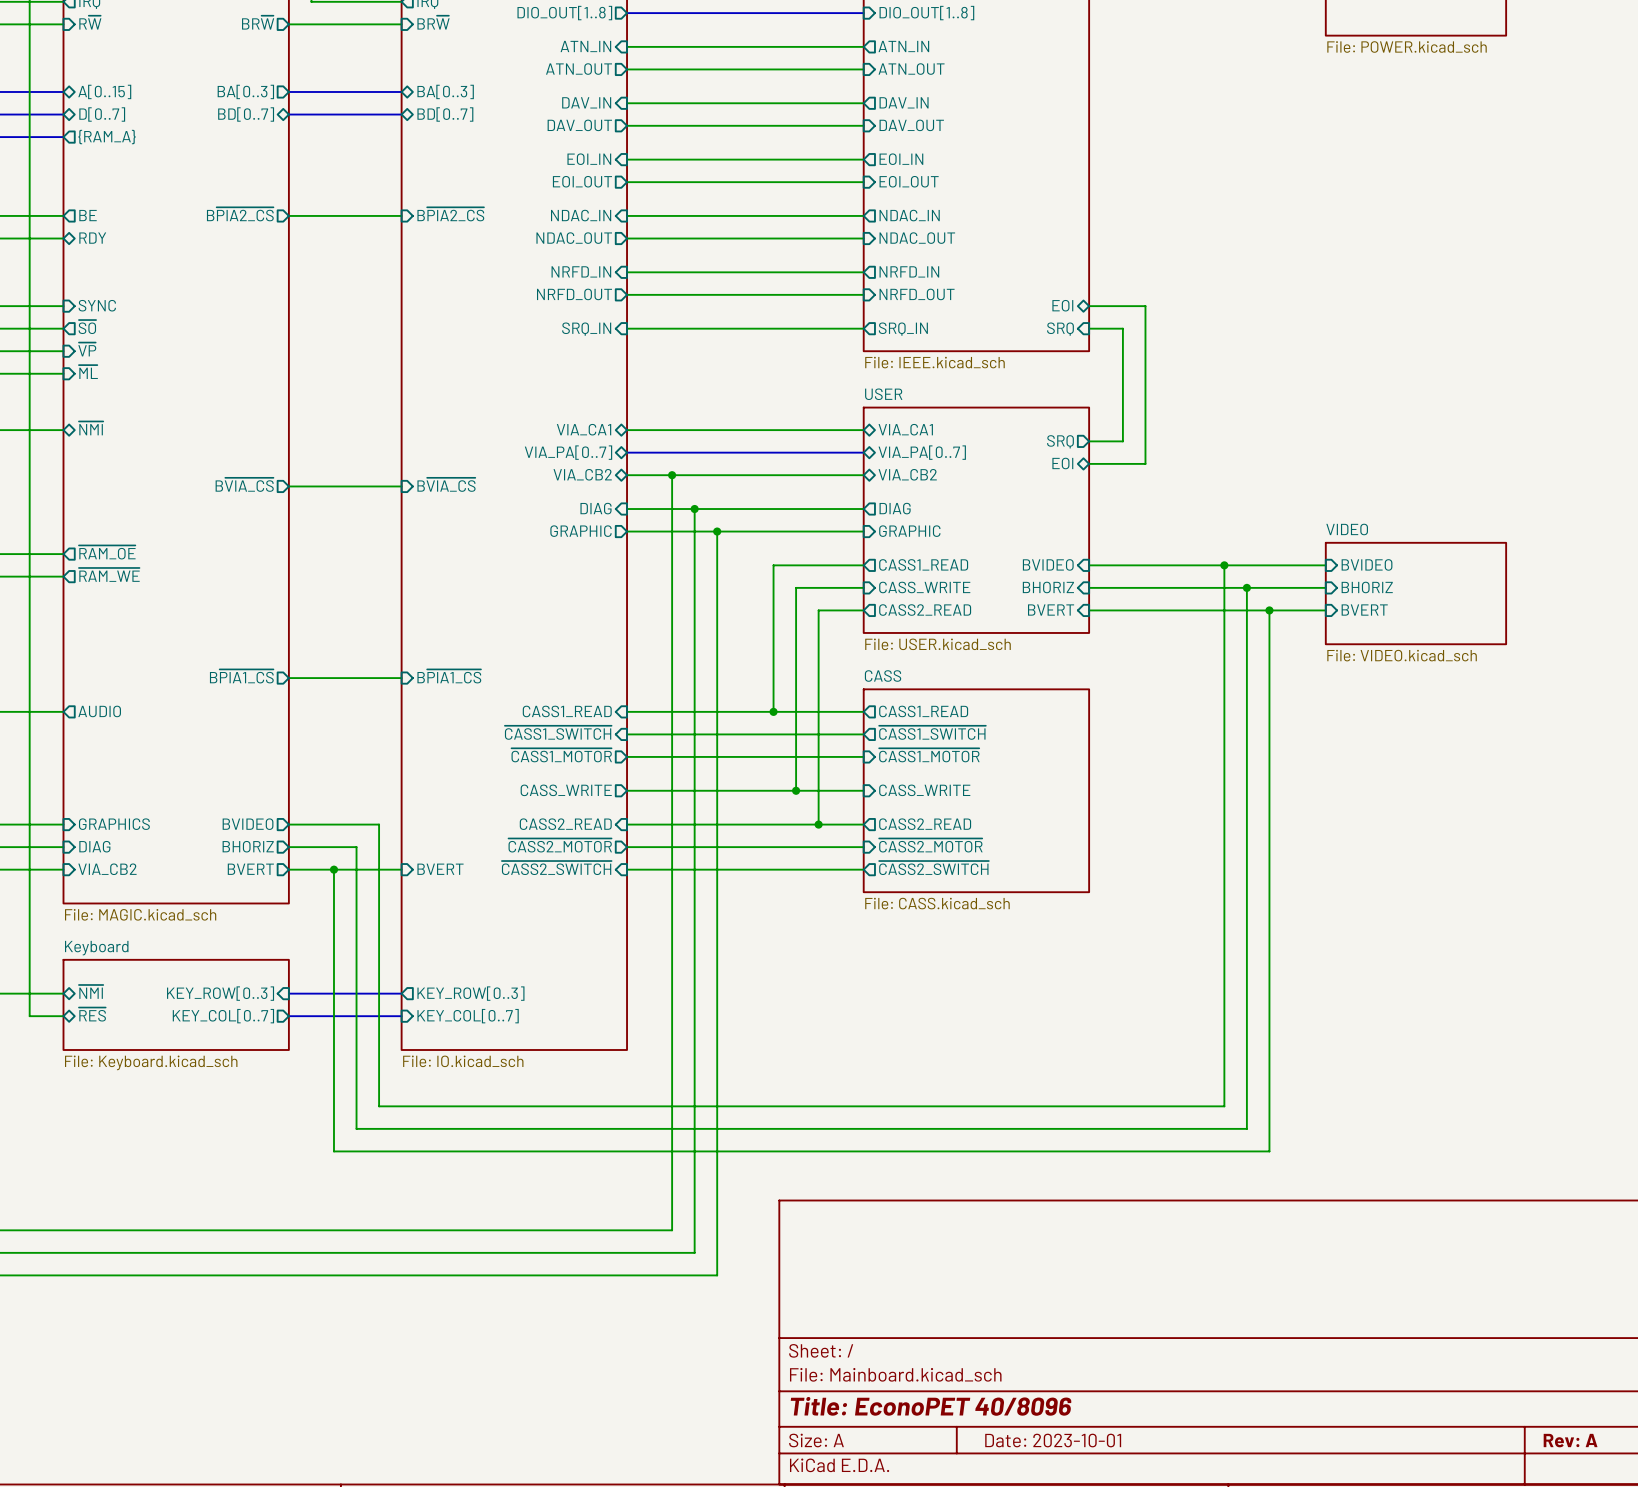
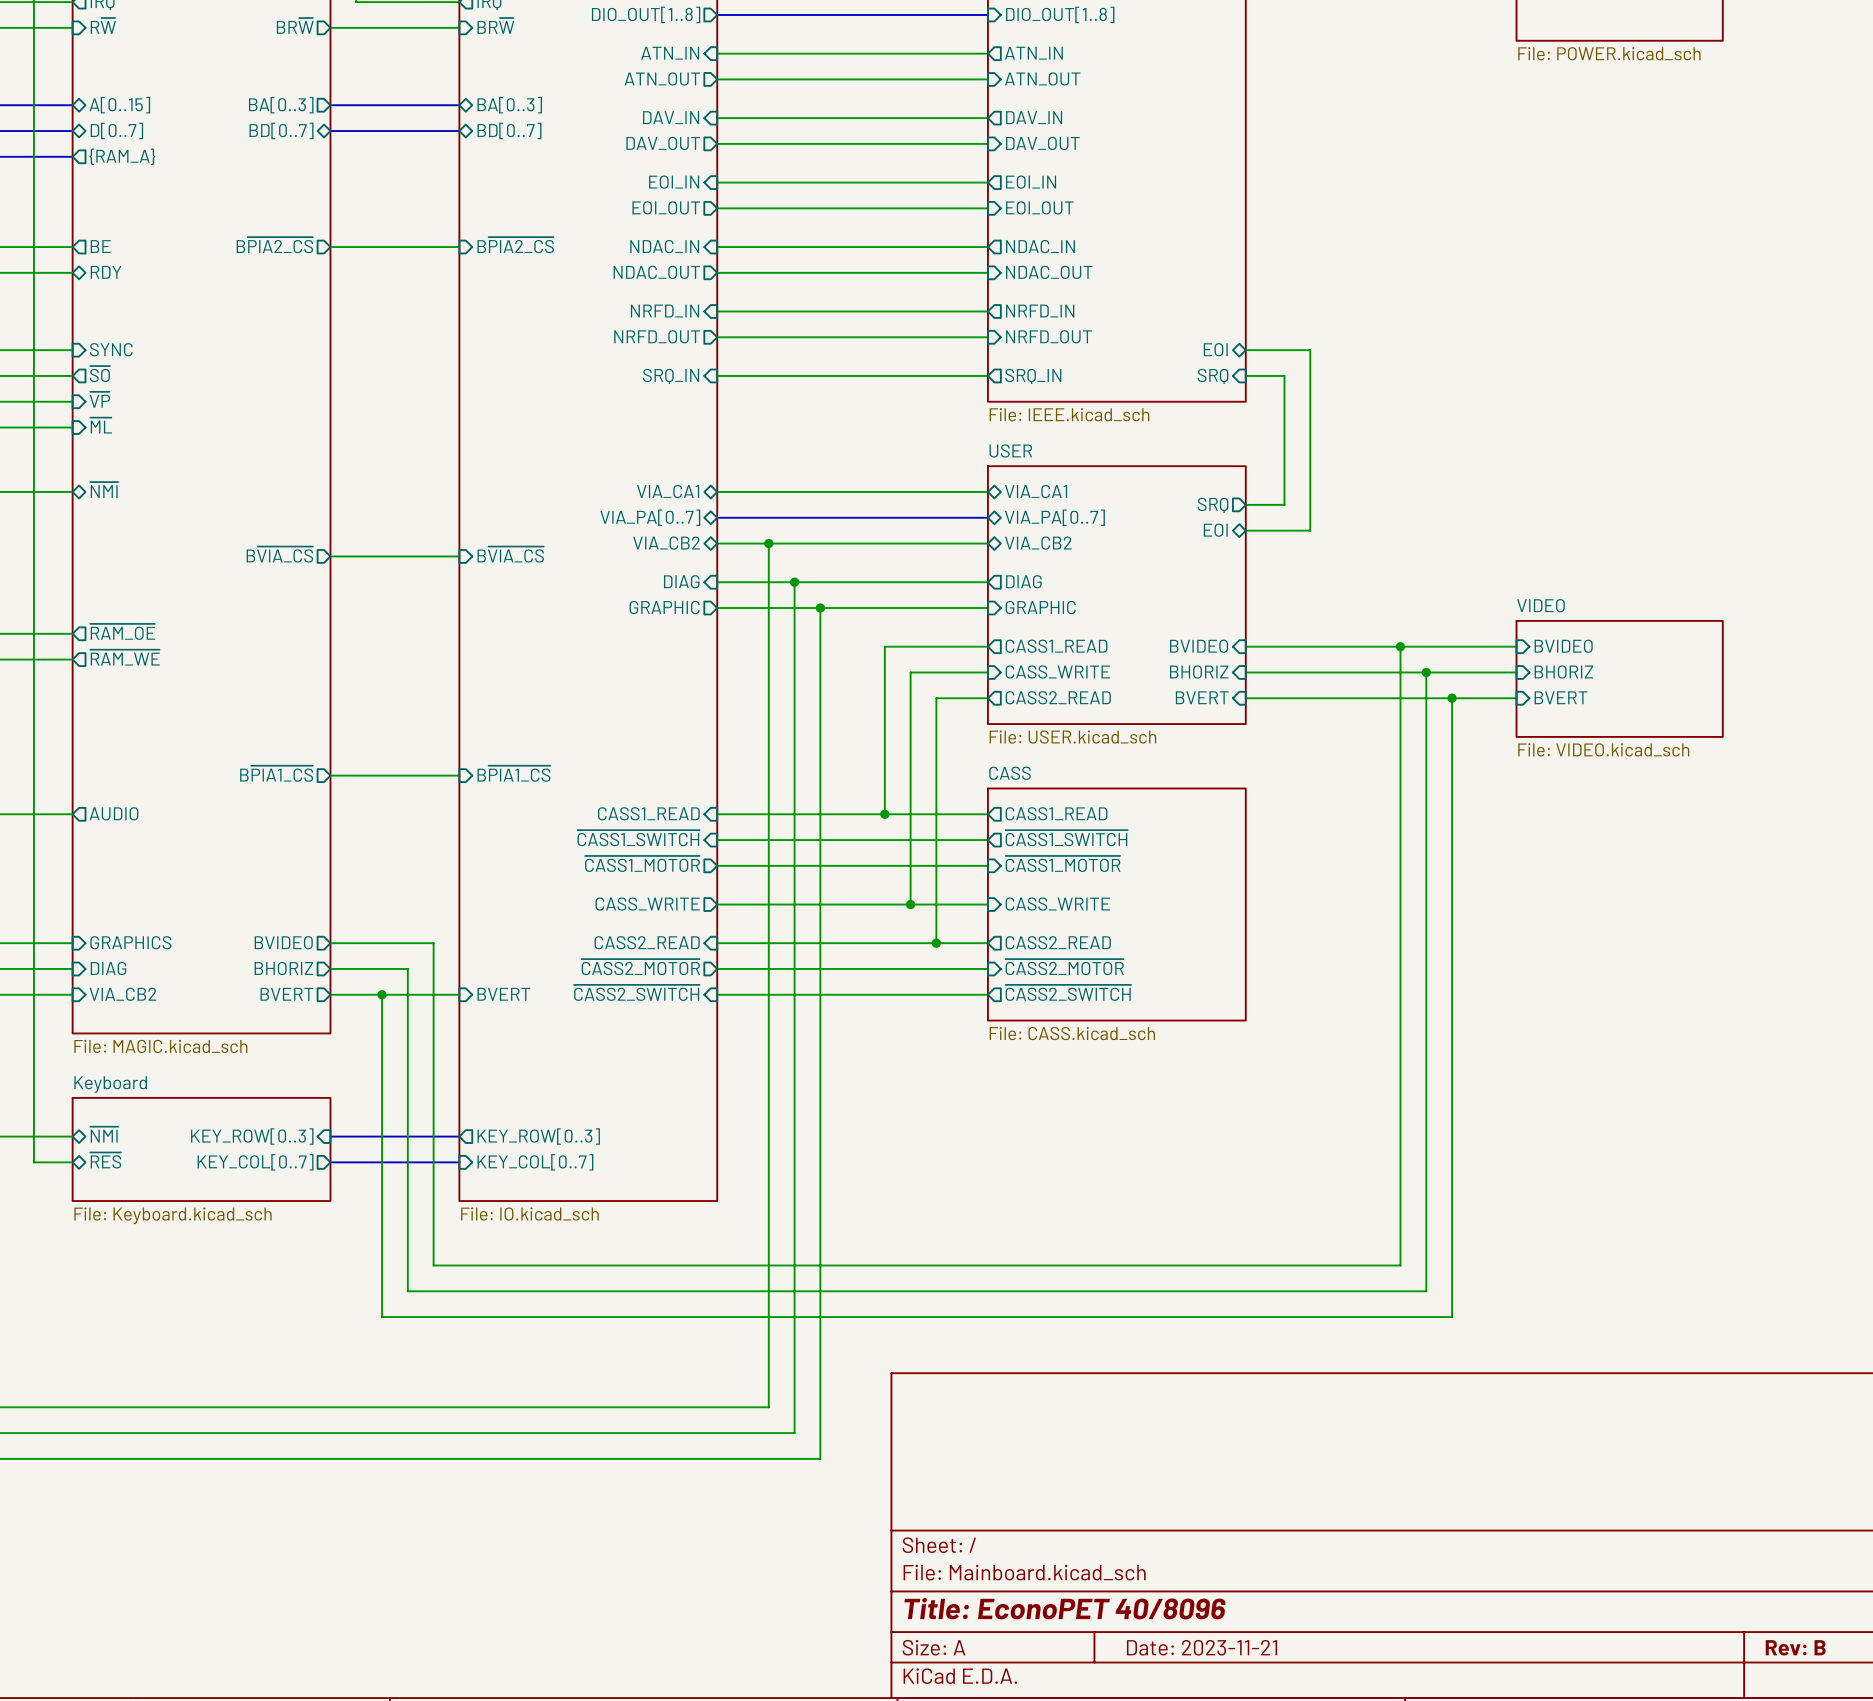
title block: Date: 2023-10-01 (1053, 1440) -> Date: 2023-11-21 (1202, 1647)
title block: Rev: A (1570, 1440) -> Rev: B (1795, 1647)

